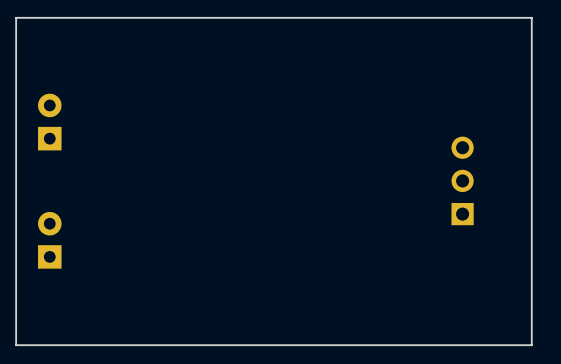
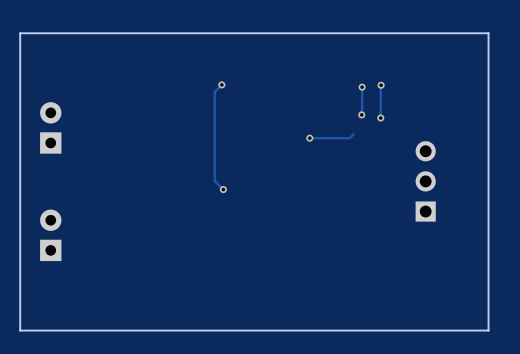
track: none -> (221, 84) (214, 92) (214, 180) (223, 189)
via: none -> (221, 84)
track: none -> (381, 85) (380, 118)
via: none -> (381, 85)
track: none -> (362, 87) (361, 114)
via: none -> (362, 87)
via: none -> (361, 114)
via: none -> (380, 118)
track: none -> (353, 134) (349, 138) (309, 138)
via: none -> (309, 138)
via: none -> (223, 189)

